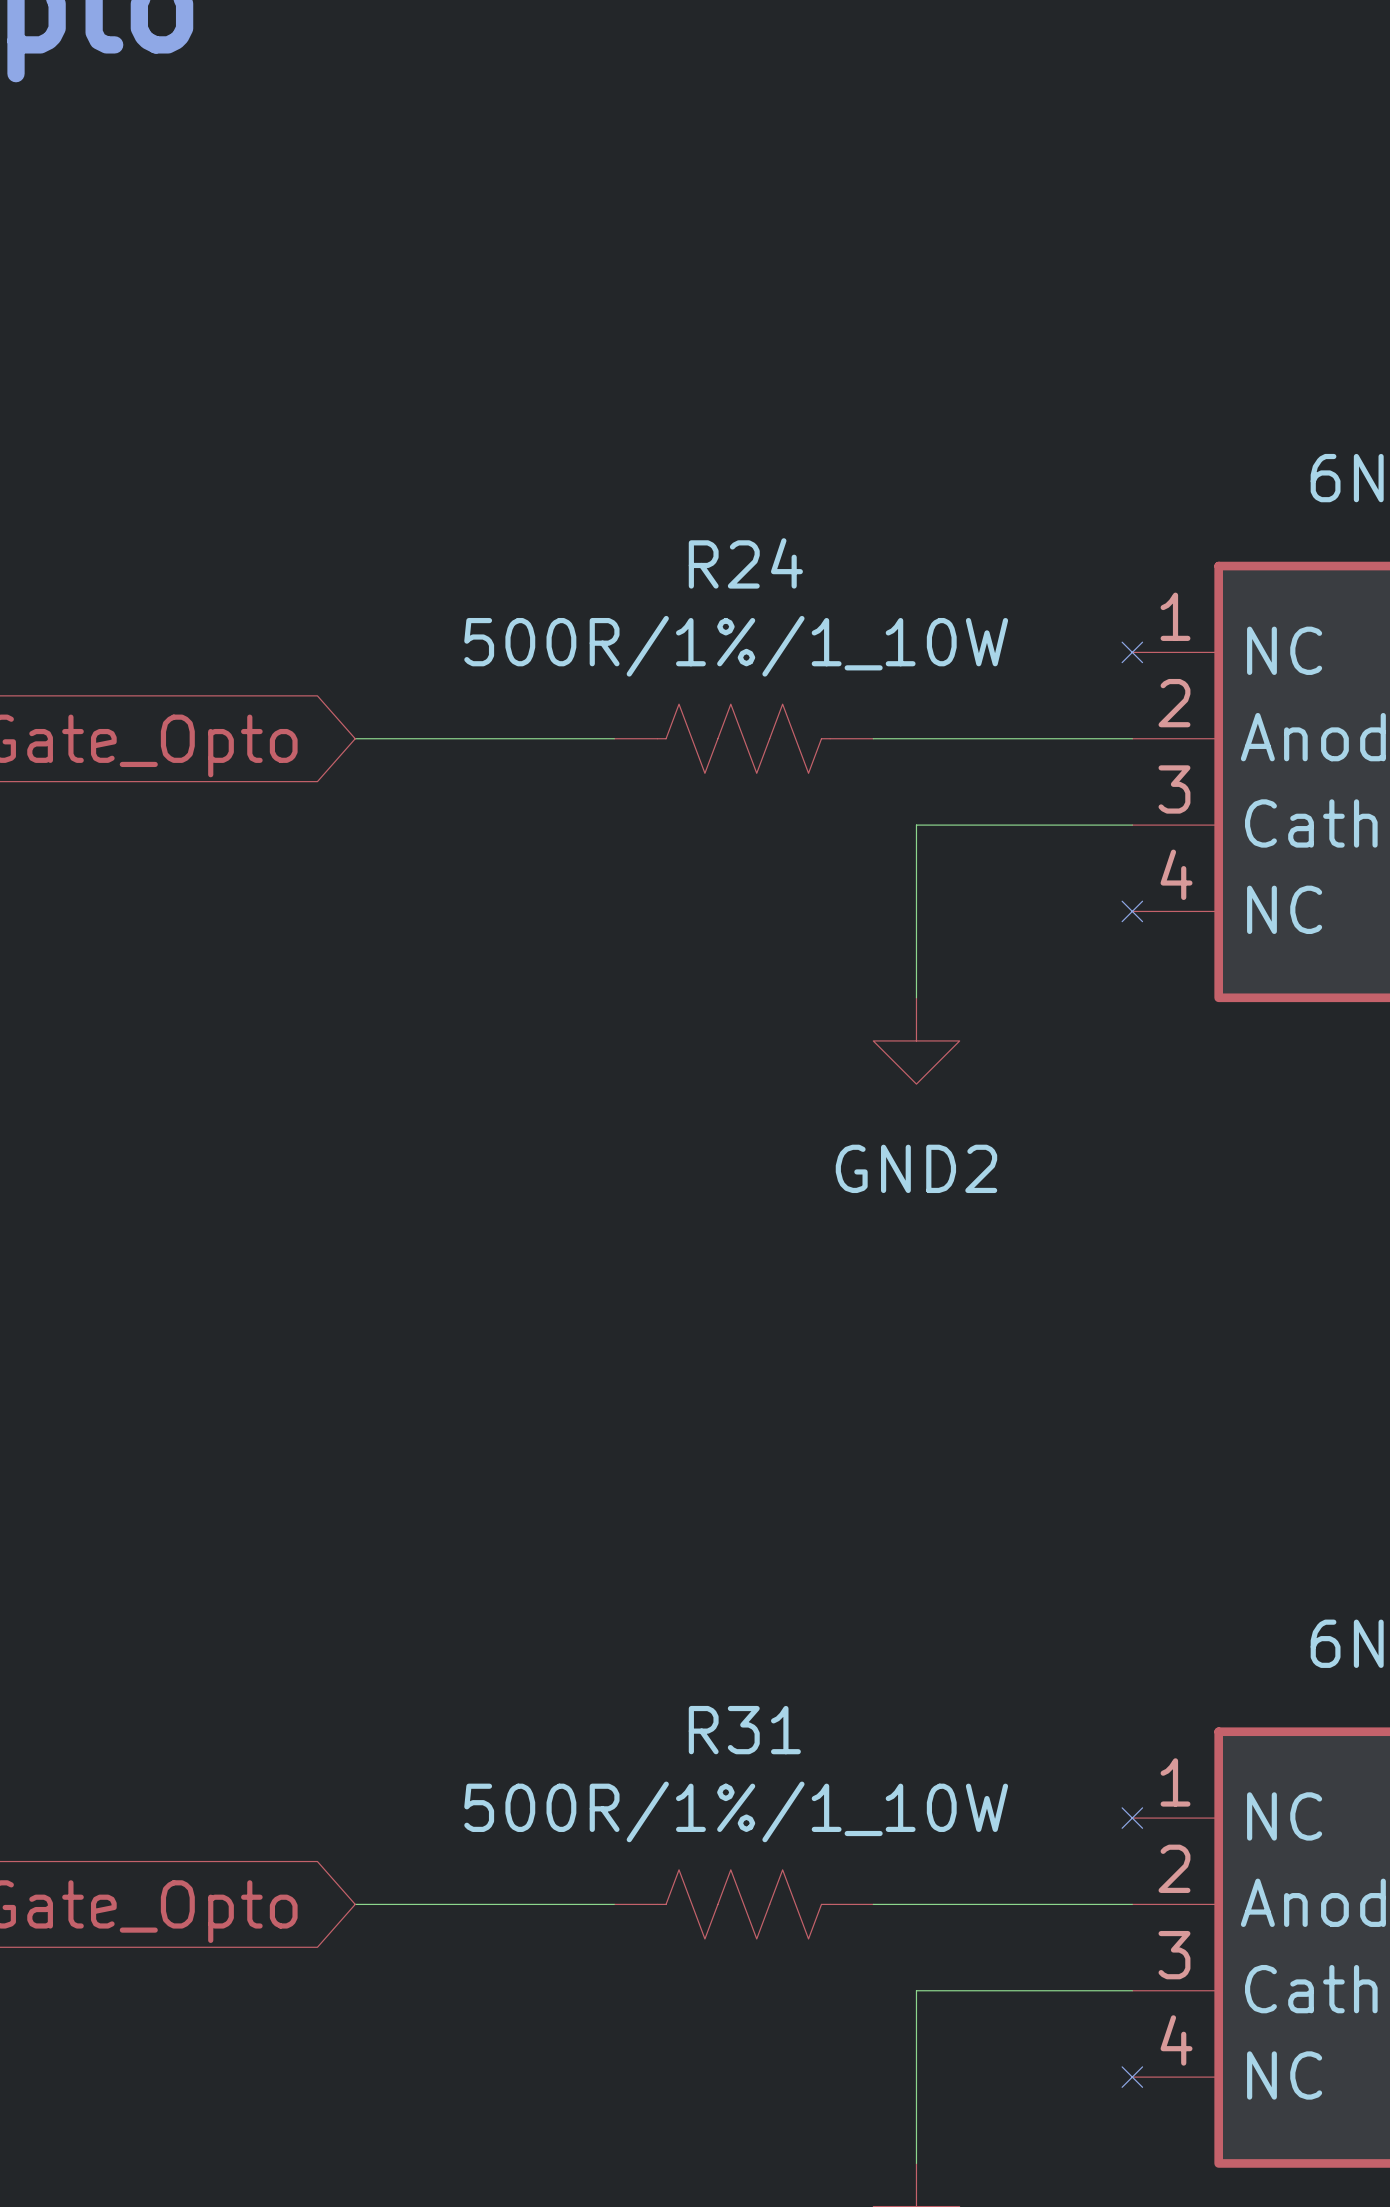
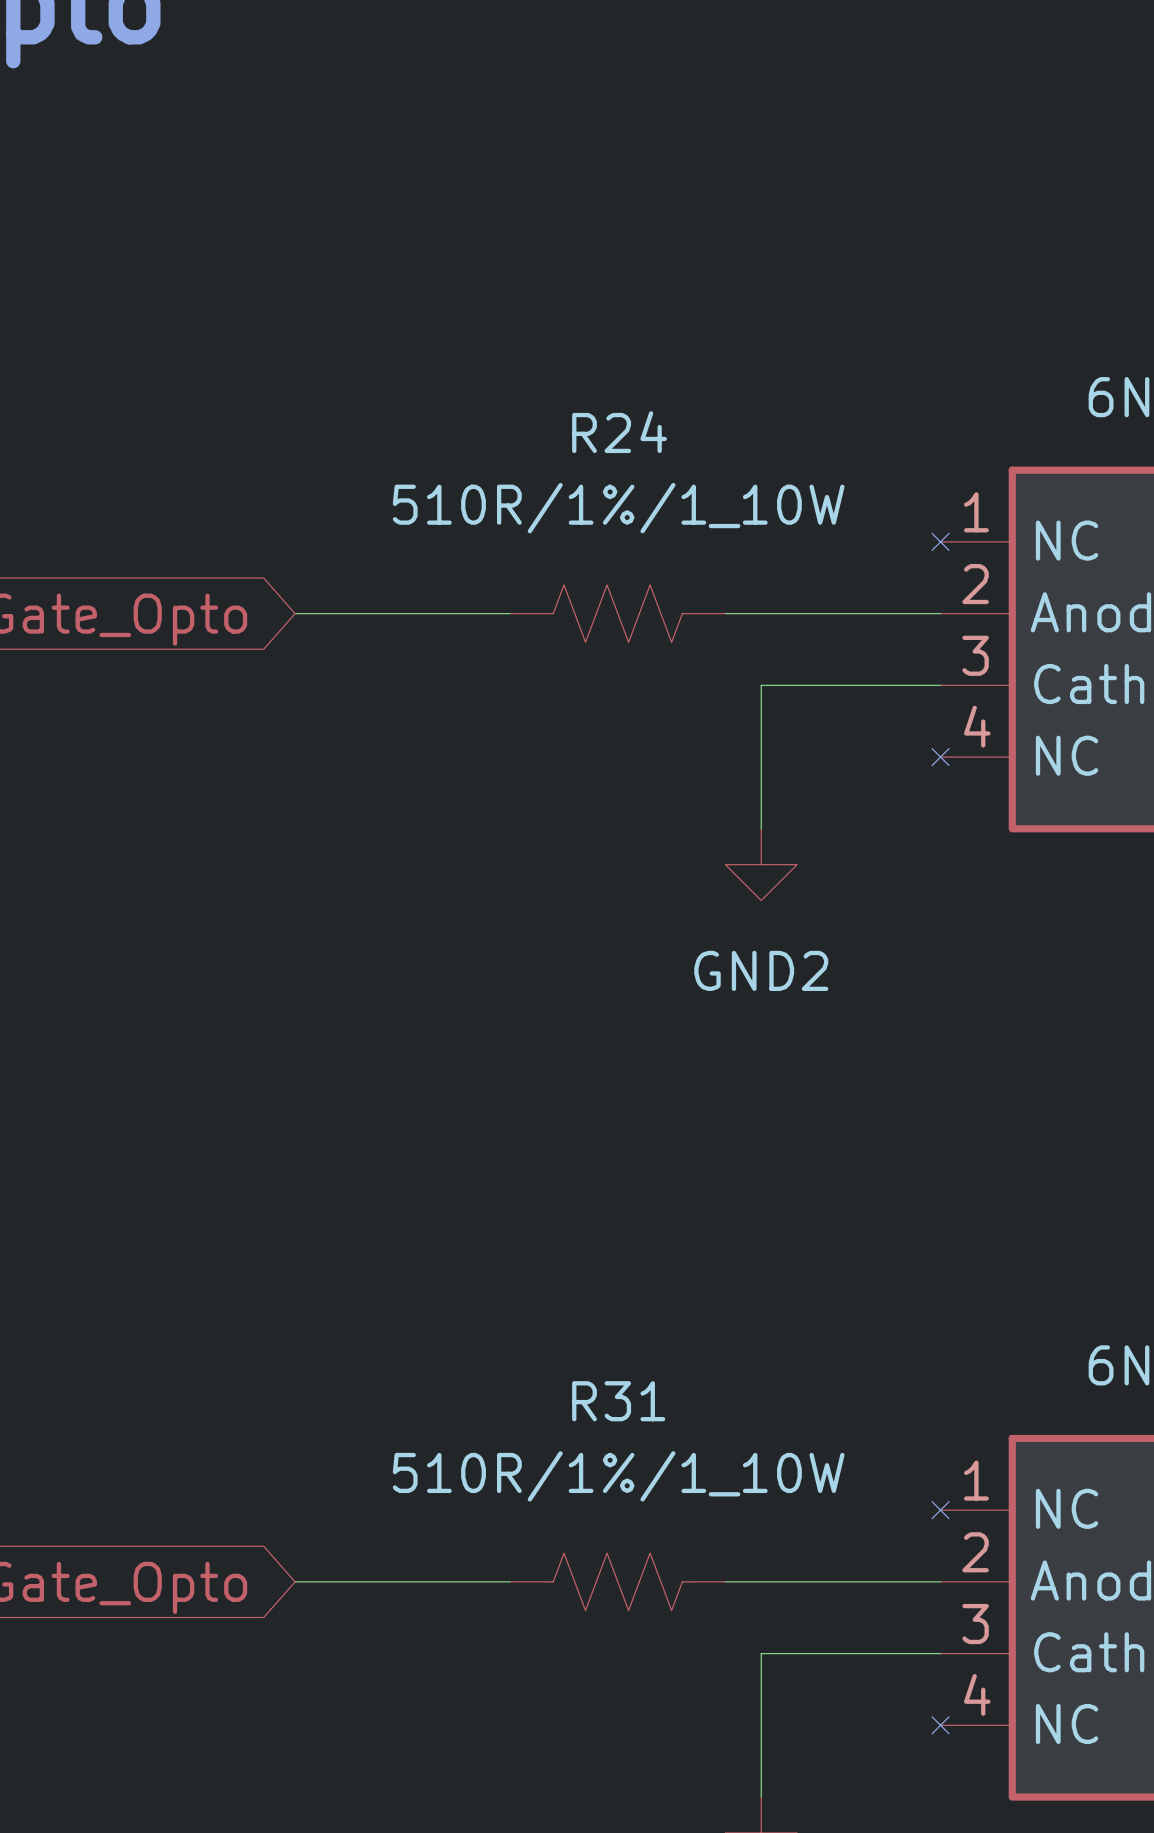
R24 name position: R24 (745, 563) -> R24 (619, 432)
R24 value: 500R/1%/1_10W (736, 646) -> 510R/1%/1_10W (618, 508)
R31 name position: R31 (744, 1730) -> R31 (618, 1401)
R31 value: 500R/1%/1_10W (736, 1811) -> 510R/1%/1_10W (618, 1476)

